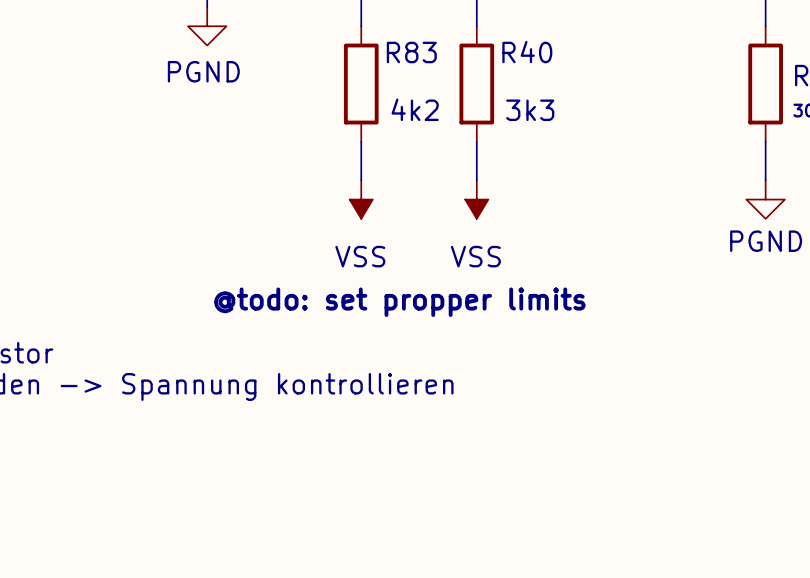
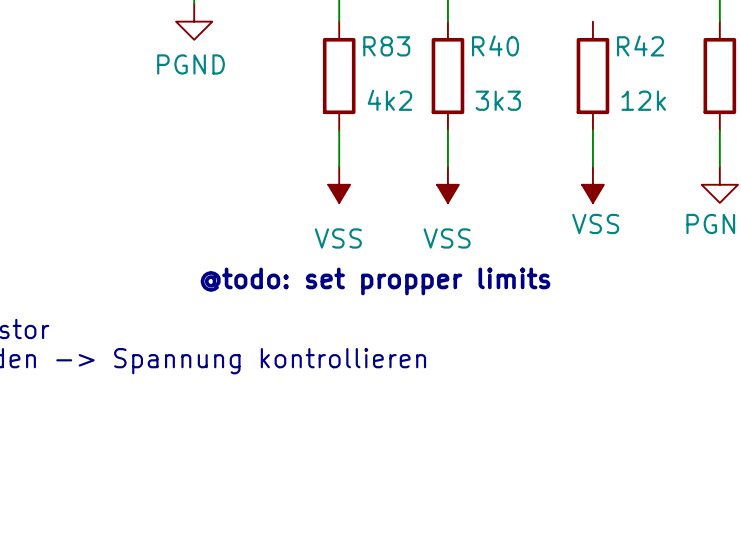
R42: none -> 12k (592, 76)
wire: none -> (592, 130) (592, 166)
power symbol: none -> VSS (592, 184)

